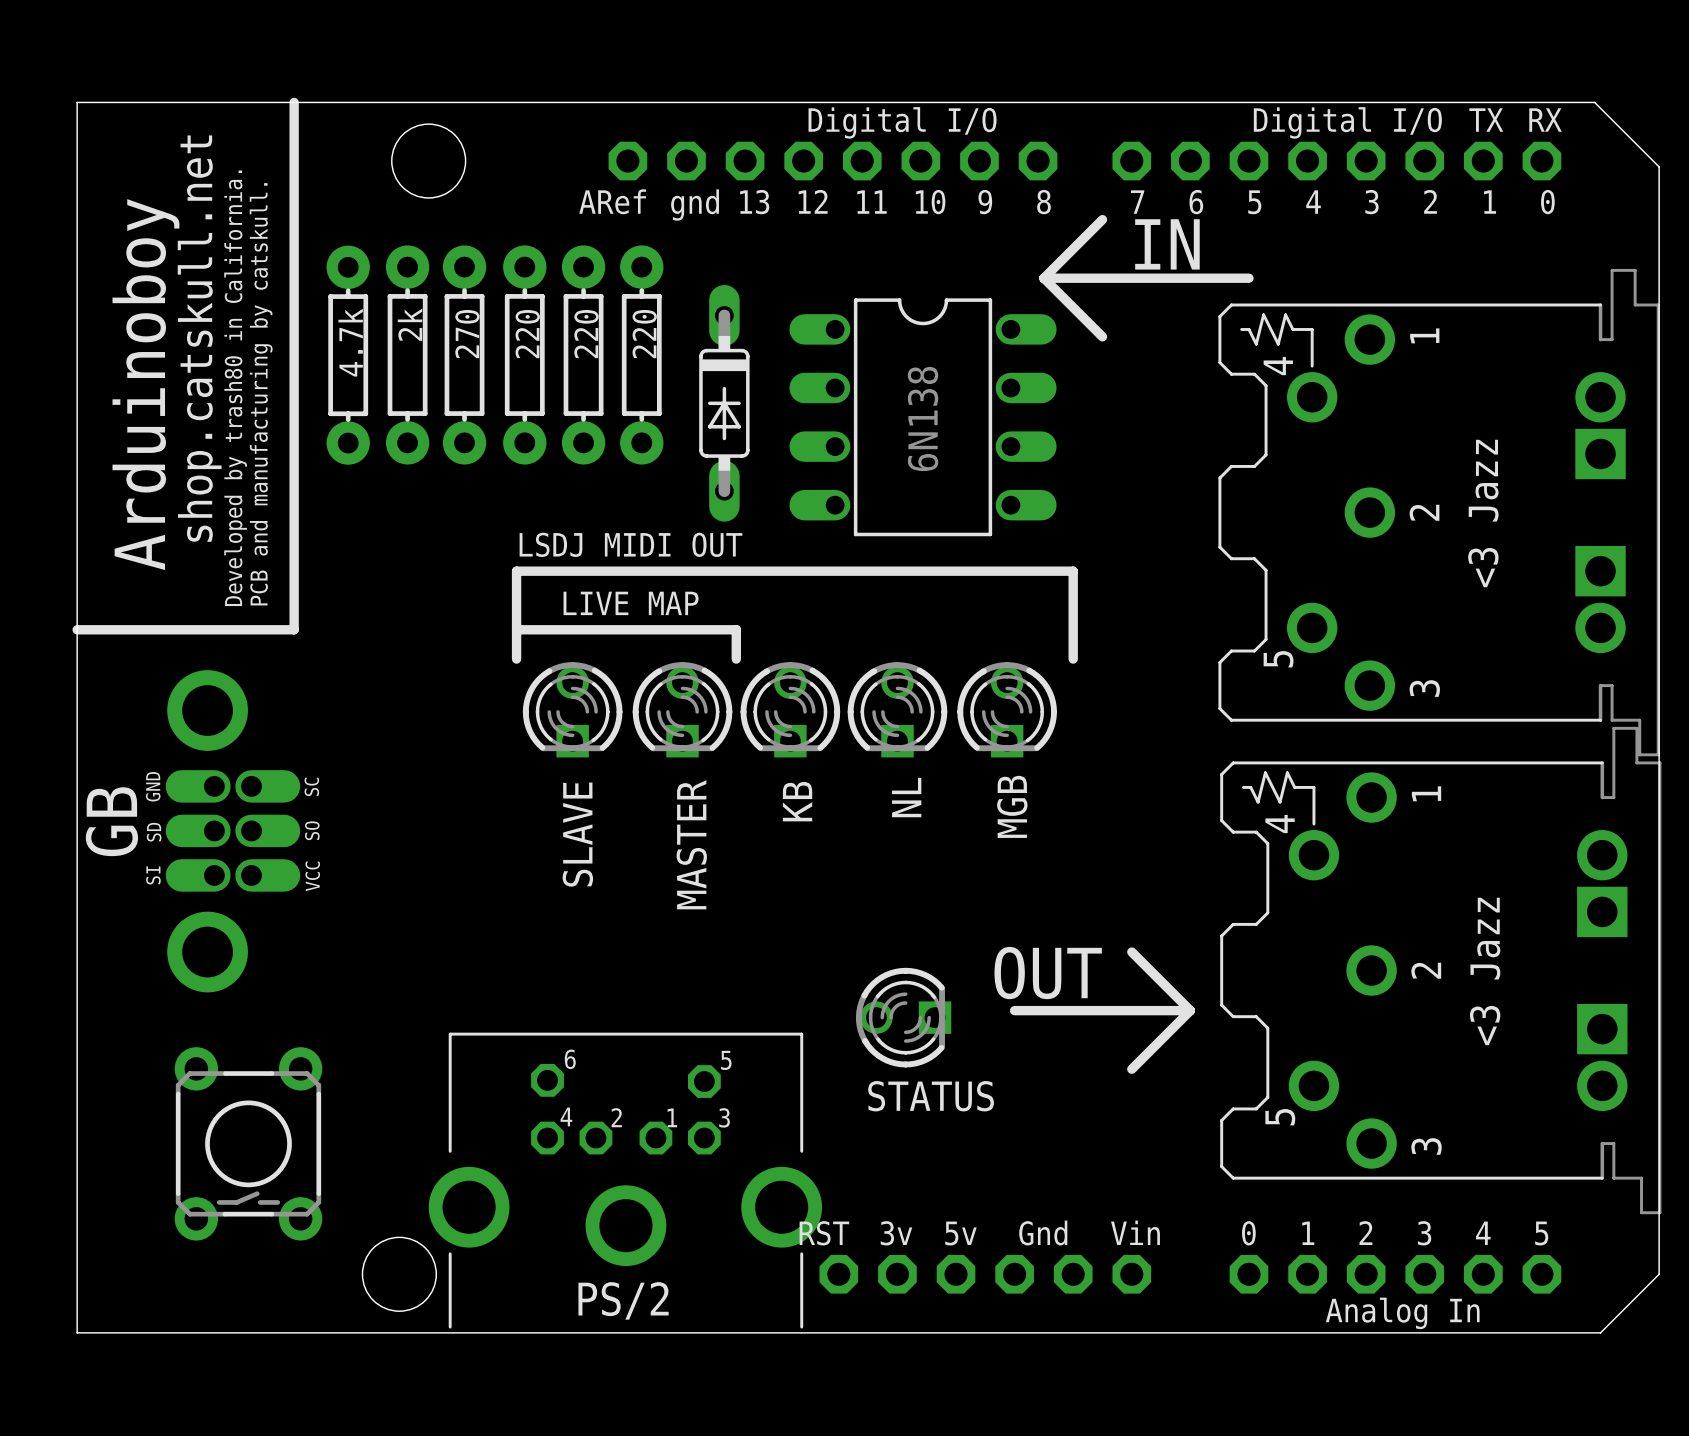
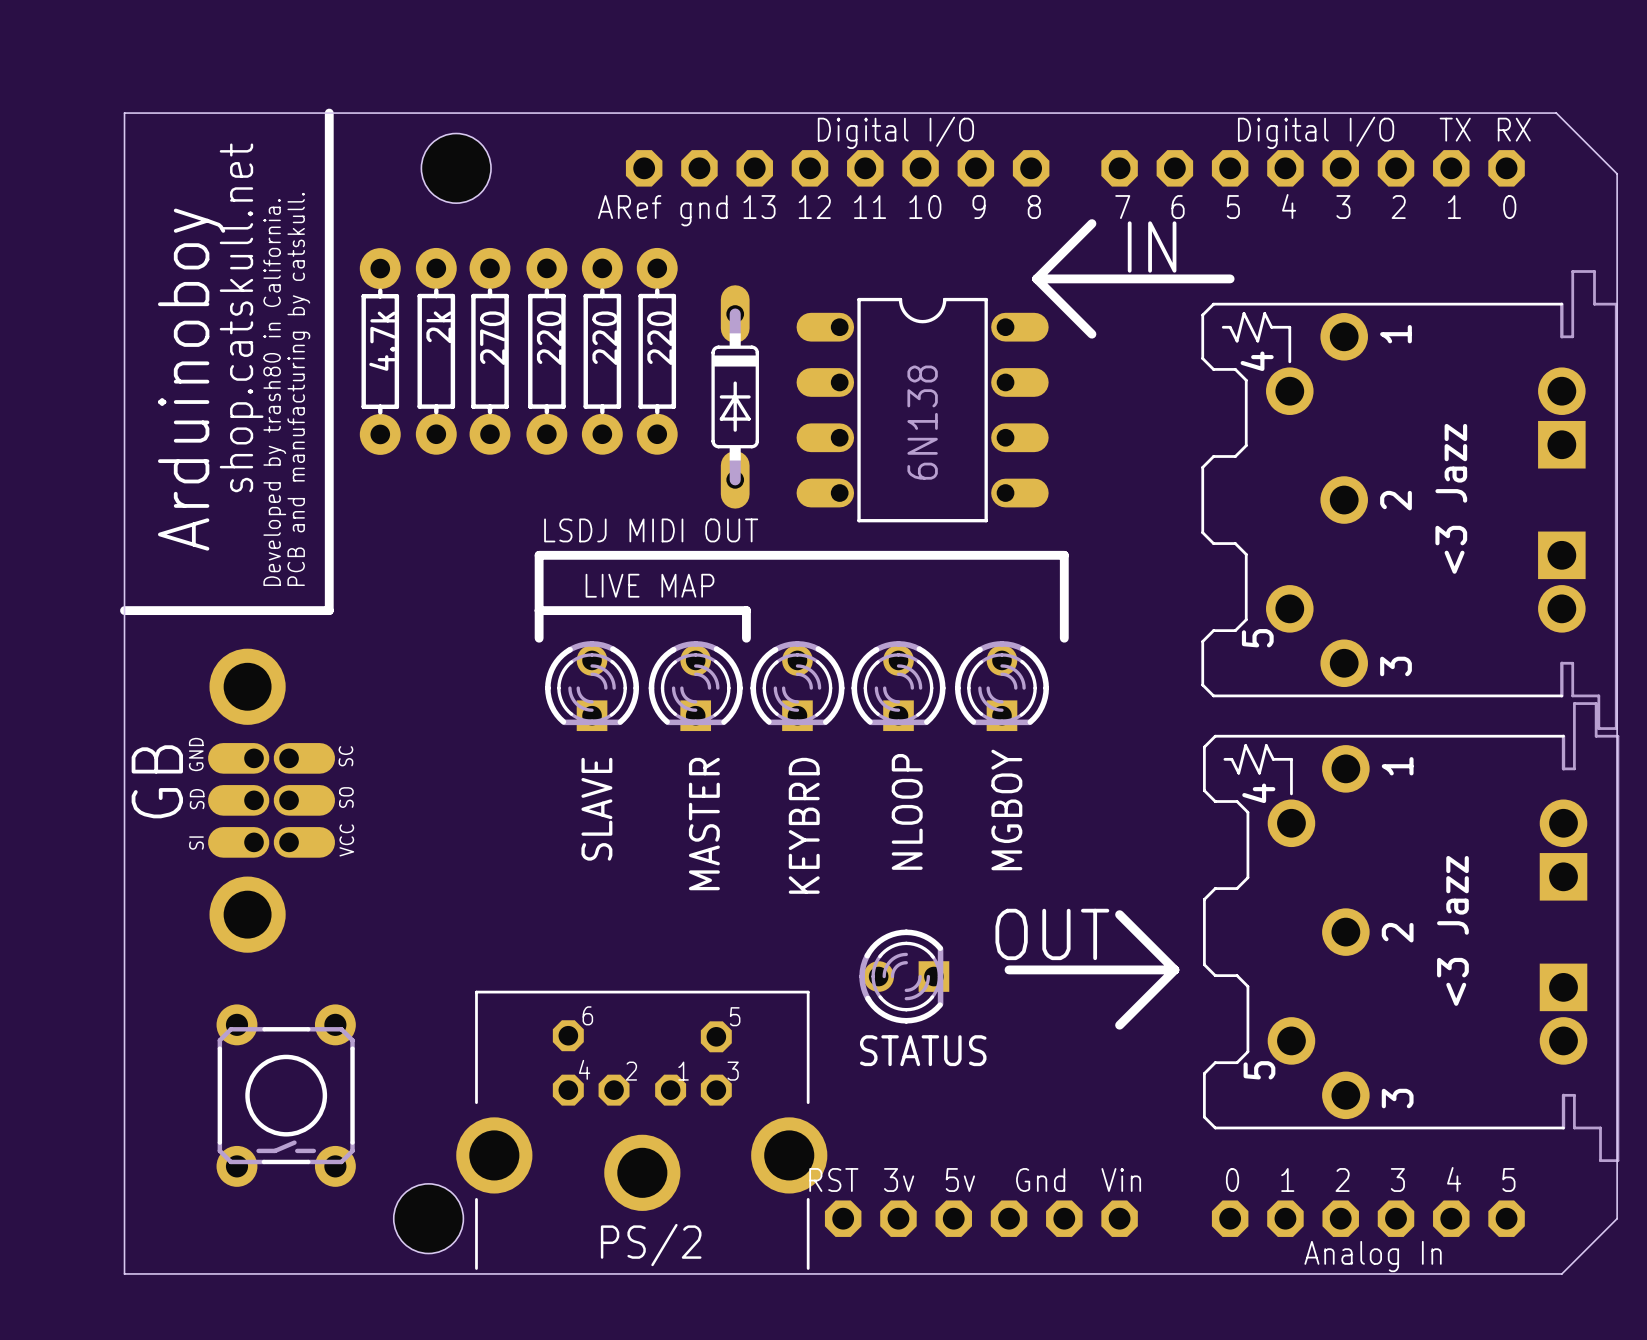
NL name: NL (906, 797) -> NLOOP (907, 811)
KB name: KB (797, 801) -> KEYBRD (804, 825)
MGB name: MGB (1012, 806) -> MGBOY (1006, 809)

